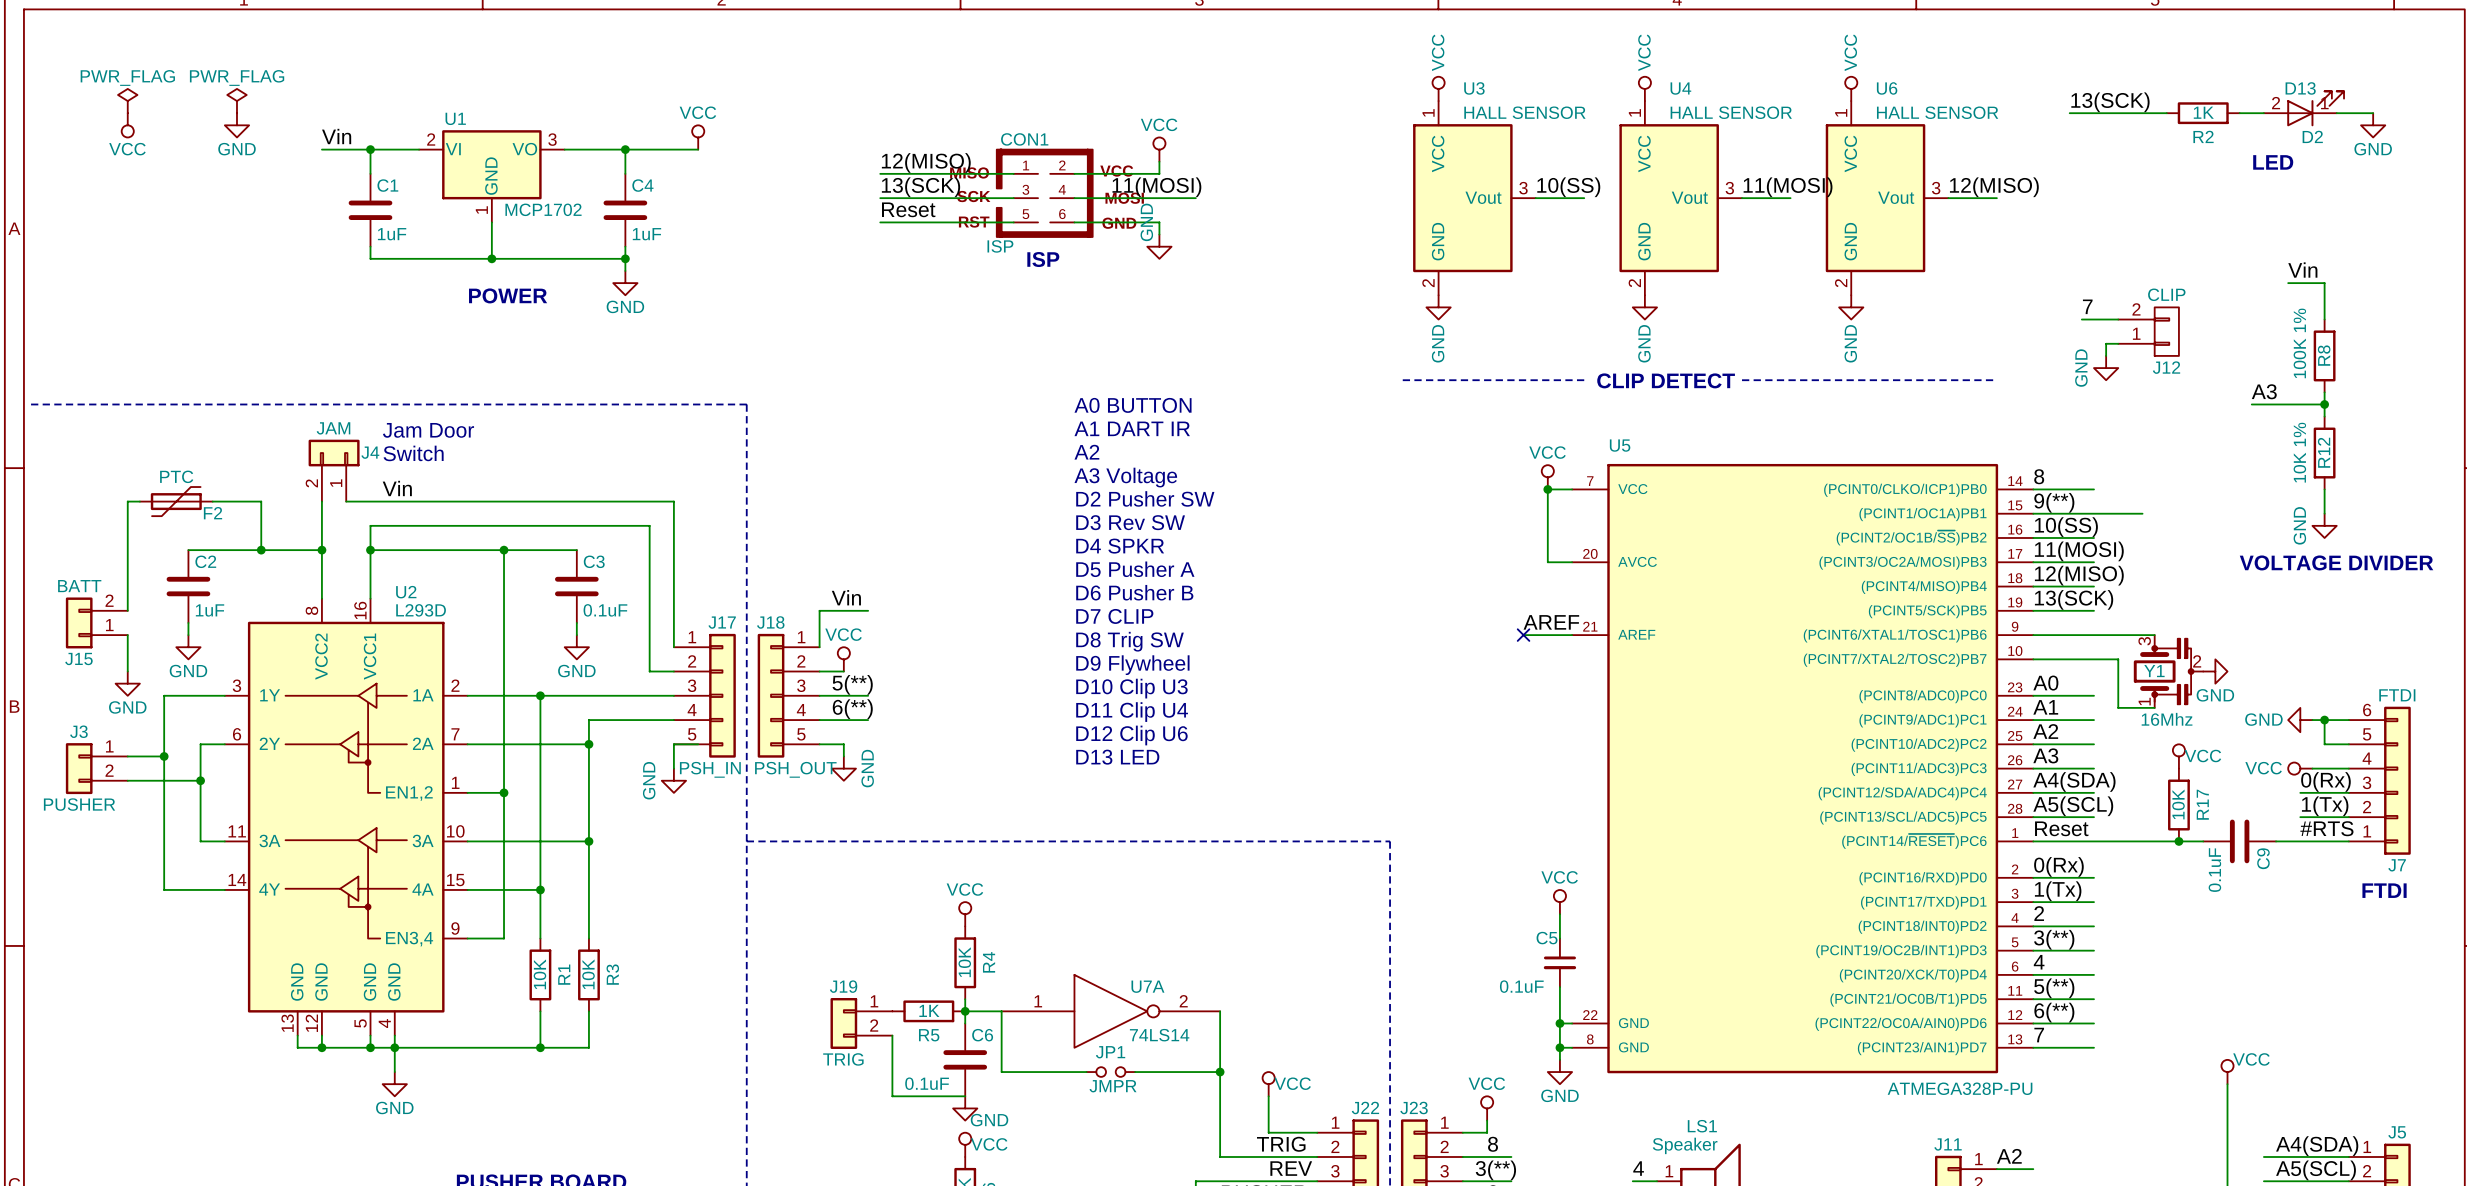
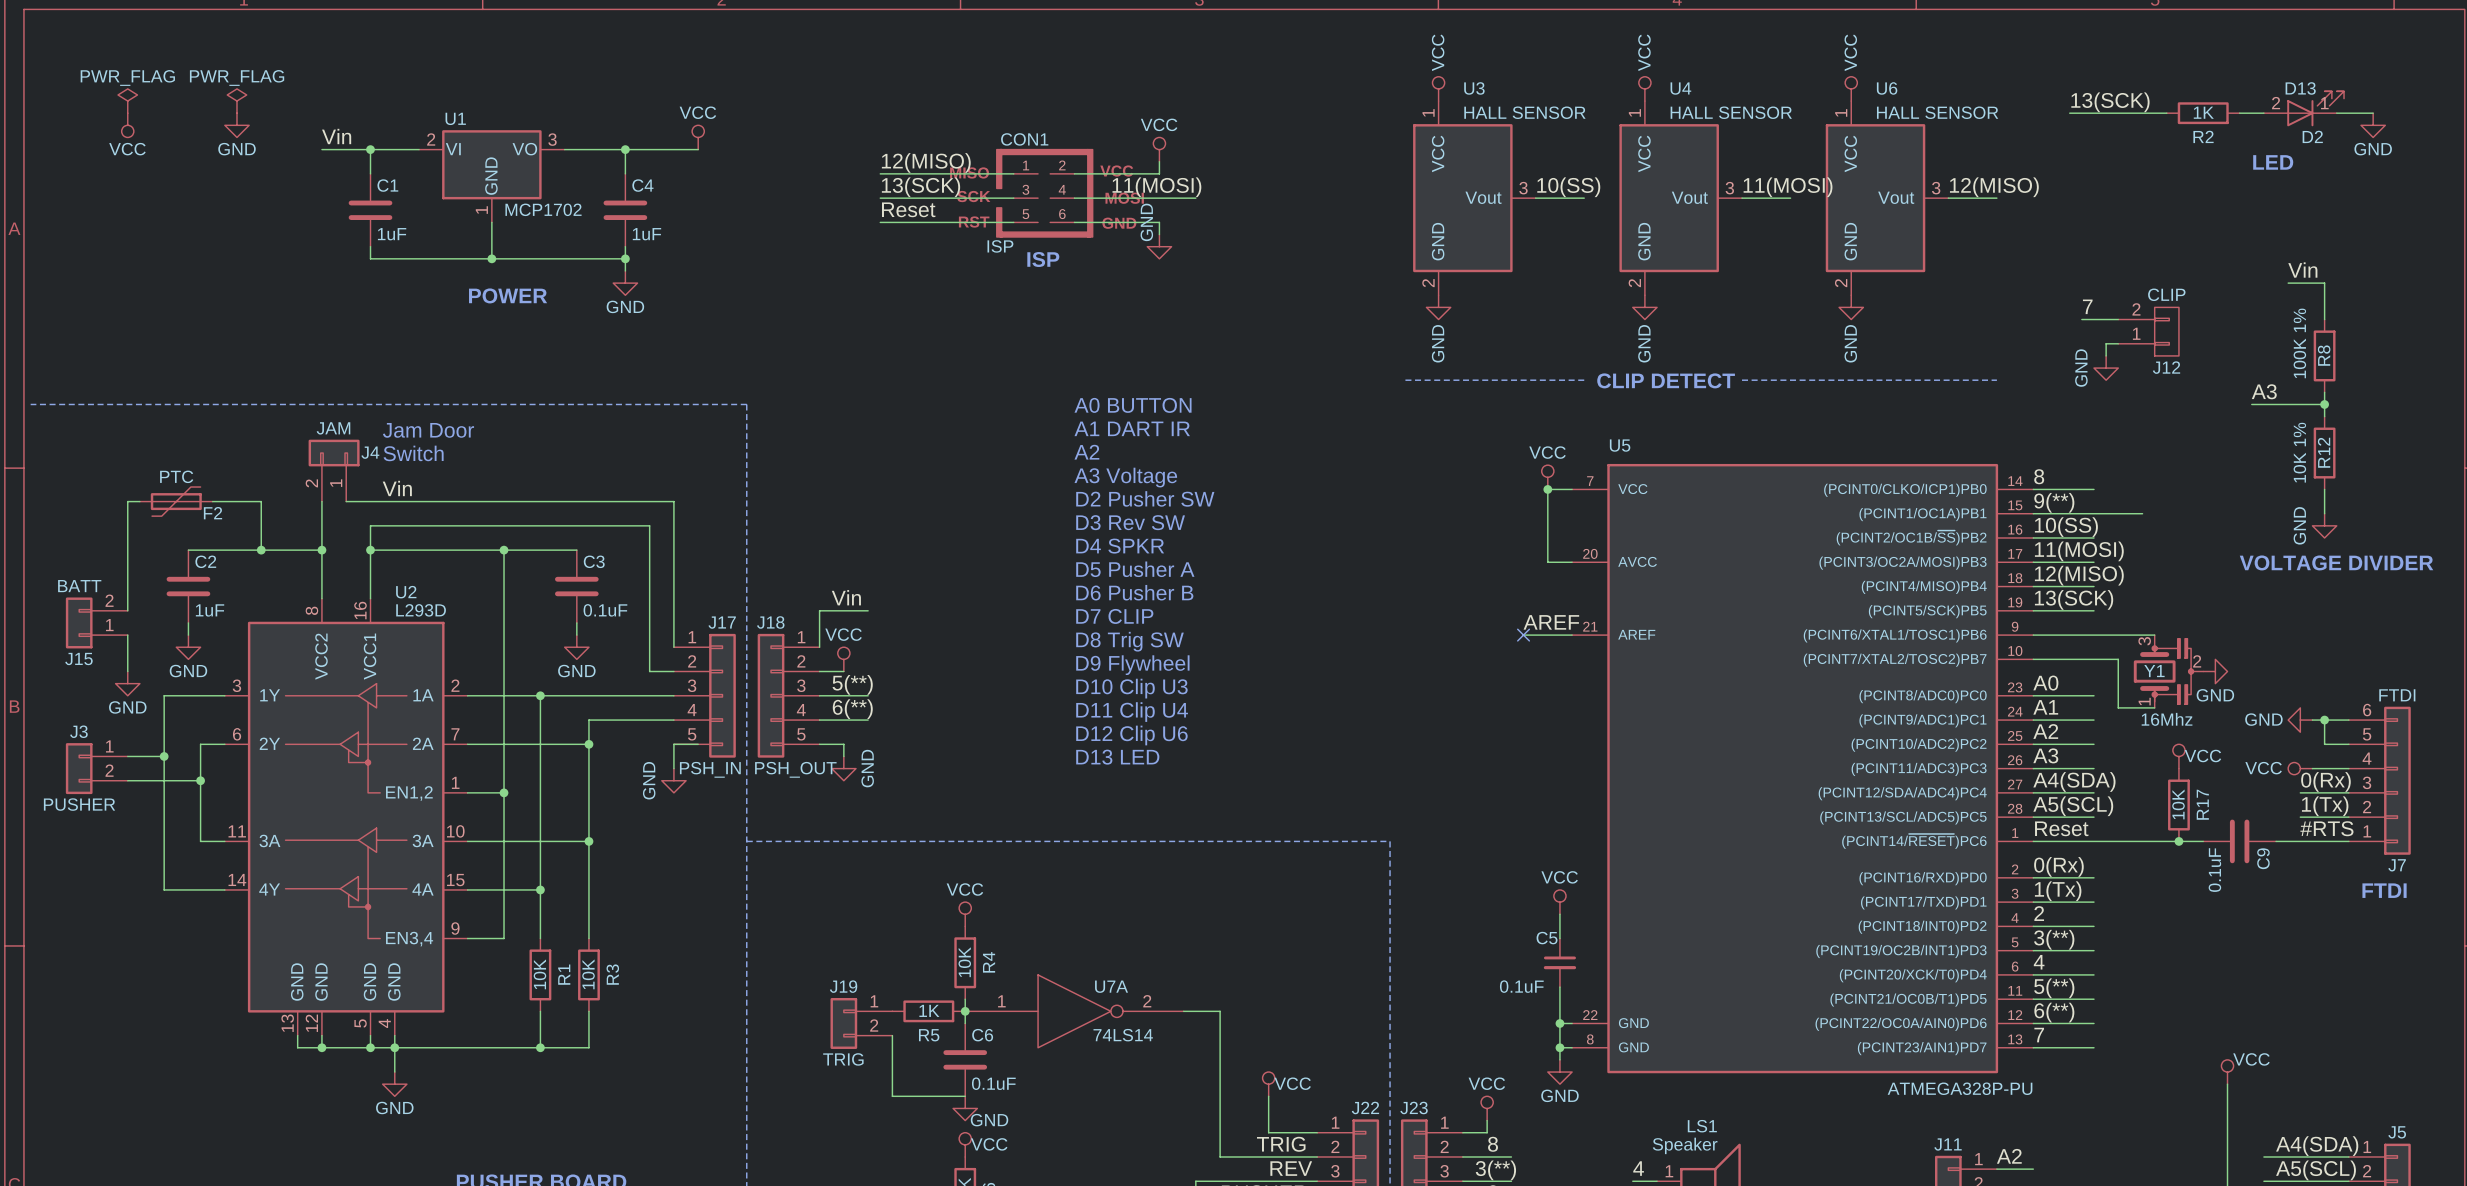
wire: (965, 1011) (1001, 1011) (1001, 1072) (1086, 1072) -> none
U7A position: (1110, 1011) -> (1074, 1011)
JP1: JMPR (1110, 1072) -> none
wire: (1135, 1072) (1220, 1072) -> none
junction: (1220, 1072) -> none
C6 value position: 0.1uF (927, 1083) -> 0.1uF (993, 1083)

